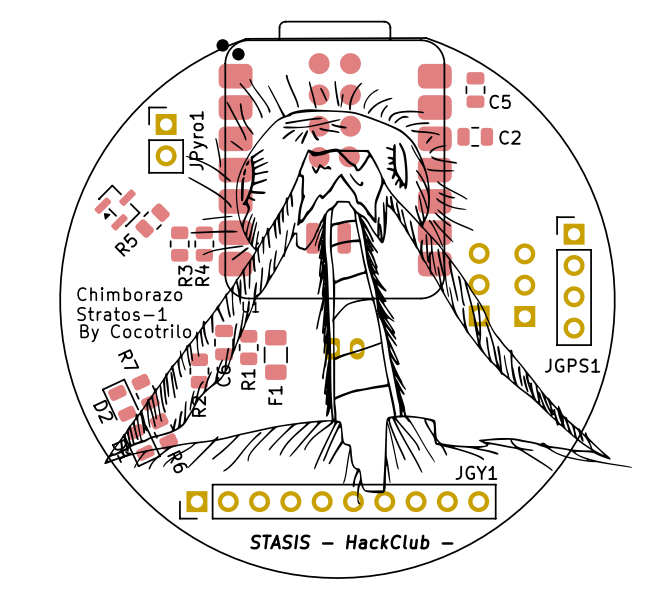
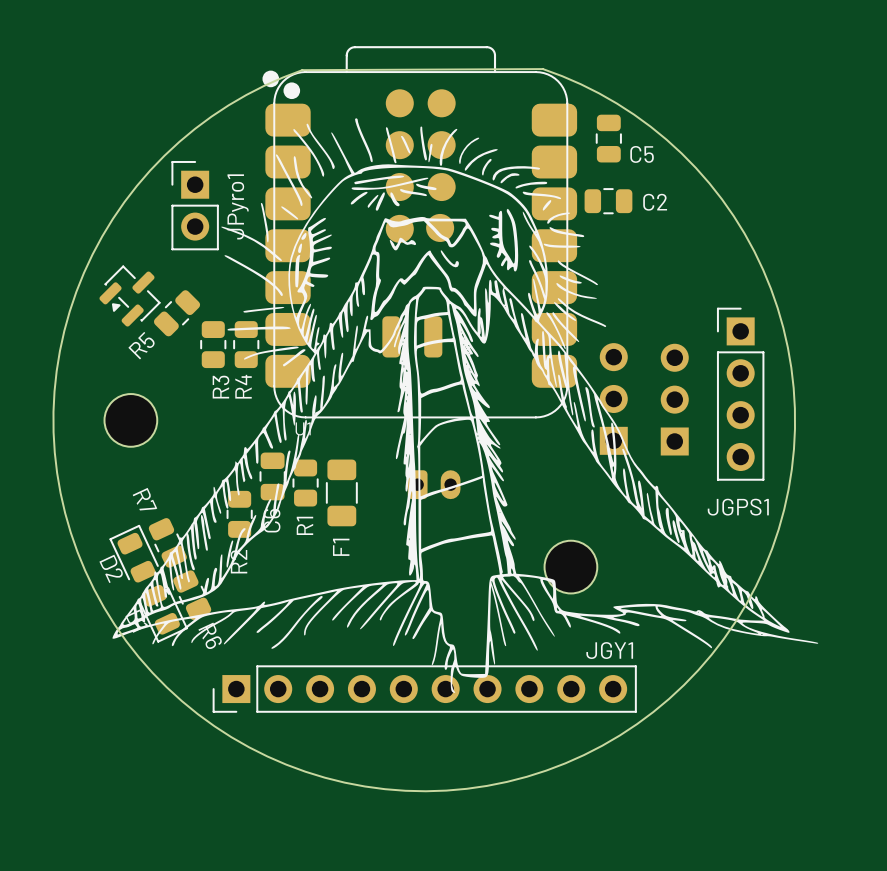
text: Chimborazo (129, 294) -> none
part: none -> (130, 420)
text: Stratos-1 (122, 314) -> none
text: By Cocotrilo (135, 333) -> none
part: none -> (570, 567)
text: STASIS - HackClub - (351, 542) -> none

